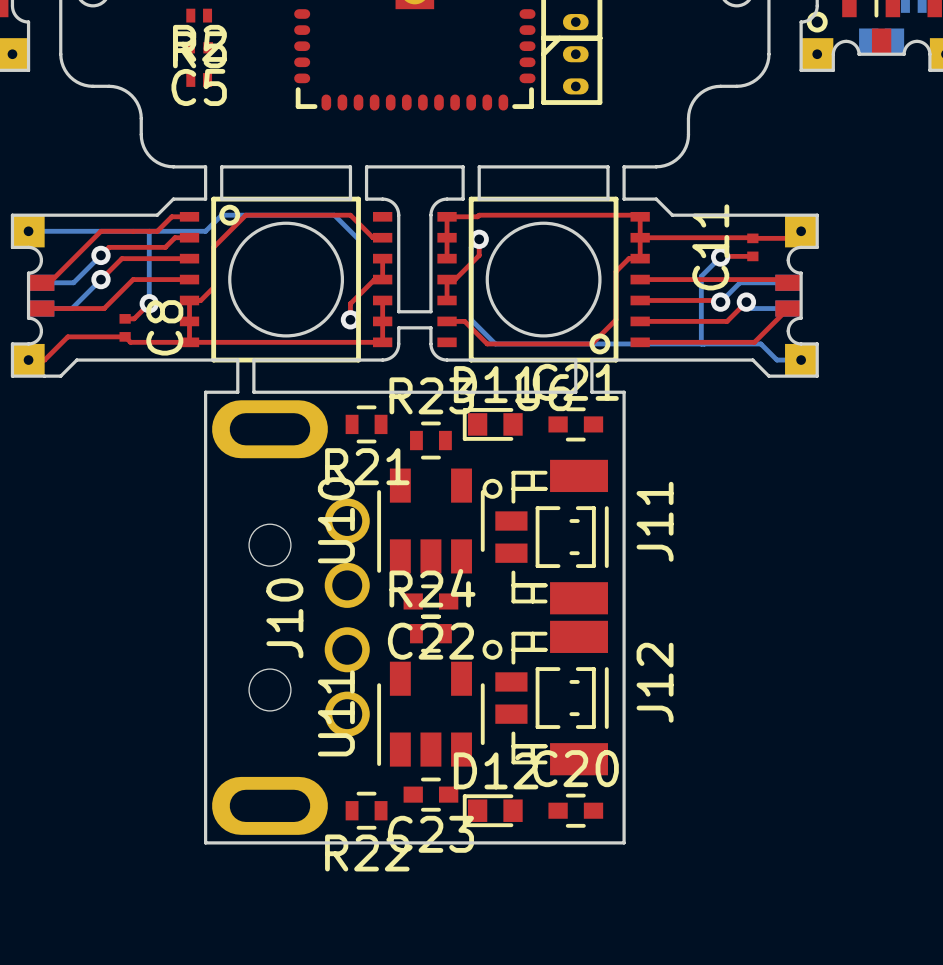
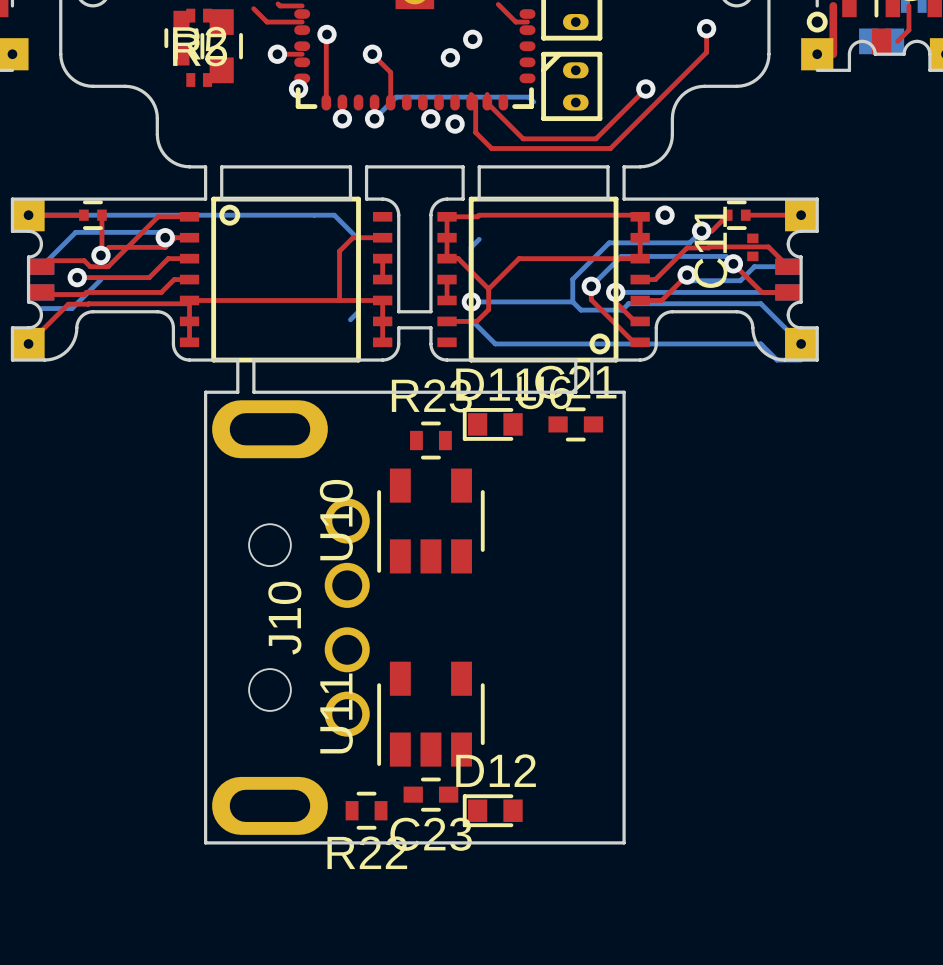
top track: none -> (278, 3) (280, 5) (302, 5)
top track: none -> (498, 4) (515, 22) (527, 22)
board edge: (12, 5) (17, 17) (28, 22) (28, 70) (12, 70) -> none
board edge: (817, 5) (812, 17) (801, 22) (801, 70) (817, 70) -> none
top track: none -> (833, 5) (833, 54)
top track: none -> (908, 5) (908, 30) (897, 41)
top track: none -> (253, 8) (267, 22) (302, 22)
top track: none -> (706, 28) (706, 52) (610, 148) (491, 148) (475, 132) (475, 98) (471, 94)
via: none -> (706, 28)
top track: none -> (326, 34) (326, 94)
via: none -> (326, 34)
part: none -> (181, 38)
via: none -> (472, 39)
part: none -> (221, 46)
C5: (199, 47) -> none
top track: none -> (277, 54) (302, 54)
via: none -> (277, 54)
top track: none -> (372, 54) (390, 72) (390, 94)
via: none -> (372, 54)
board edge: (875, 54) (859, 54) (854, 44) (847, 41) (841, 42) (833, 50) (833, 70) -> (875, 54) (870, 44) (863, 41) (857, 42) (849, 50) (849, 70) (833, 70)
via: none -> (450, 57)
part position: (571, 70) -> (571, 86)
board edge: (109, 86) (125, 90) (136, 102) (140, 114) (142, 142) (150, 157) (165, 165) (189, 166) -> (109, 86) (133, 87) (147, 95) (156, 110) (157, 138) (161, 150) (173, 162) (189, 166)
board edge: (720, 86) (704, 90) (692, 102) (688, 114) (687, 142) (679, 157) (664, 165) (640, 166) -> (720, 86) (696, 87) (681, 95) (673, 110) (672, 138) (668, 150) (656, 162) (640, 166)
via: none -> (298, 88)
top track: none -> (645, 88) (595, 138) (523, 138) (487, 102) (487, 94)
via: none -> (645, 88)
bottom track: none -> (533, 101) (528, 97) (396, 97) (374, 118)
via: none -> (342, 118)
via: none -> (374, 118)
via: none -> (430, 118)
via: none -> (455, 124)
board edge: (173, 199) (157, 215) (12, 215) -> (173, 199) (12, 199) (12, 215)
board edge: (656, 199) (672, 215) (817, 215) -> (656, 199) (817, 199) (817, 215)
top track: none -> (28, 215) (83, 215)
part: none -> (92, 215)
top track: none -> (101, 215) (101, 249)
bottom track: (221, 215) (205, 231) (28, 231) -> (221, 215) (28, 215)
via: none -> (665, 215)
top track: none -> (727, 215) (711, 231) (701, 231)
part: none -> (736, 215)
top track: none -> (745, 215) (801, 215)
top track: (171, 216) (157, 231) (100, 231) (49, 282) (41, 282) -> (171, 216) (158, 216) (108, 266) (90, 266) (84, 260) (47, 260) (41, 266)
round board edge: [228, 221, 345, 338] -> none
round board edge: [485, 221, 602, 338] -> none
board edge: (12, 231) (12, 247) (31, 247) (40, 255) (41, 261) (38, 268) (28, 273) -> (12, 231) (31, 231) (40, 239) (41, 245) (38, 252) (28, 257) (28, 273)
bottom track: (149, 231) (149, 303) -> none
bottom track: none -> (701, 231) (689, 242) (609, 242) (572, 279) (572, 301)
via: none -> (701, 231)
top track: (801, 231) (794, 238) (640, 237) -> none
board edge: (817, 231) (817, 247) (797, 247) (789, 255) (789, 266) (794, 271) (801, 273) -> (817, 231) (797, 231) (789, 239) (789, 250) (794, 255) (801, 257) (801, 273)
bottom track: none -> (165, 237) (159, 232) (75, 232) (41, 266)
via: none -> (165, 237)
top track: (372, 237) (350, 215) (245, 215) (213, 247) (213, 287) (200, 300) -> (382, 300) (200, 300)
top track: none -> (372, 237) (353, 237) (339, 251) (339, 300)
top track: (479, 239) (479, 255) (455, 279) (447, 279) -> none
via: (479, 239) -> none
bottom track: (100, 255) (73, 282) (41, 282) -> none
top track: (752, 256) (720, 257) -> none
bottom track: (720, 257) (701, 276) (701, 343) -> none
via position: (720, 257) -> (733, 263)
top track: (168, 258) (121, 258) (100, 279) -> (168, 258) (149, 277) (77, 277)
top track: none -> (447, 258) (458, 258) (488, 288)
top track: (628, 258) (616, 271) (616, 319) (591, 343) (487, 343) (464, 321) -> (628, 258) (519, 258) (488, 288)
bottom track: none -> (733, 263) (726, 256) (621, 256) (591, 286)
top track: none -> (733, 263) (762, 292) (788, 292)
bottom track: none -> (788, 266) (754, 266) (740, 280) (692, 280) (687, 275)
via: none -> (687, 275)
via position: (100, 279) -> (77, 277)
top track: (174, 279) (133, 279) (104, 308) (41, 308) -> (174, 279) (161, 292) (86, 292) (84, 294) (43, 294) (41, 292)
top track: (382, 279) (374, 279) (350, 303) (350, 319) -> none
top track: (655, 279) (785, 279) (788, 282) -> (655, 279) (686, 247) (768, 246) (788, 266)
bottom track: (788, 282) (739, 282) (720, 302) -> none
via: none -> (591, 286)
top track: none -> (488, 288) (488, 309) (476, 321) (464, 321)
bottom track: none -> (615, 292) (788, 292)
via: none -> (615, 292)
part position: (33, 295) -> (33, 279)
part position: (796, 295) -> (796, 279)
top track: none -> (189, 300) (186, 303) (88, 303)
top track: (661, 300) (719, 300) (720, 302) -> (661, 300) (687, 275)
bottom track: none -> (471, 301) (572, 301)
via: none -> (471, 301)
bottom track: none -> (572, 301) (580, 310) (622, 310) (628, 303) (760, 303) (801, 343)
board edge: (28, 302) (28, 318) (34, 319) (39, 324) (40, 336) (31, 343) (12, 343) -> (28, 302) (34, 303) (39, 308) (40, 319) (31, 327) (12, 327) (12, 343)
via: (720, 302) -> none
bottom track: (746, 302) (752, 308) (788, 308) -> none
top track: (746, 302) (727, 321) (640, 321) -> (615, 292) (615, 302) (634, 321) (640, 321)
via: (746, 302) -> none
board edge: (801, 302) (801, 318) (790, 323) (788, 329) (789, 336) (797, 343) (817, 343) -> (801, 302) (790, 307) (788, 313) (789, 319) (797, 327) (817, 327) (817, 343)
top track: (149, 303) (134, 318) (125, 318) -> none
via: (149, 303) -> none
top track: none -> (88, 304) (68, 304) (28, 343)
top track: (788, 308) (754, 342) (640, 342) -> (591, 286) (591, 299) (633, 342) (640, 342)
via: (350, 319) -> none
C8: (125, 327) -> none
top track: (382, 342) (130, 342) (125, 336) (67, 336) (44, 360) (28, 360) -> none
board edge: (12, 360) (12, 376) (60, 376) (76, 360) (189, 360) -> (12, 360) (48, 359) (60, 355) (72, 343) (80, 318) (86, 312) (92, 311) (157, 311) (165, 313) (172, 323) (175, 352) (181, 357) (189, 360)
board edge: (640, 360) (752, 360) (768, 376) (817, 376) (817, 360) -> (640, 360) (648, 357) (654, 352) (657, 321) (662, 315) (672, 311) (740, 312) (750, 319) (757, 343) (768, 355) (780, 359) (817, 360)
R21: (366, 424) -> none
J11: (545, 537) -> none
C22: (430, 601) -> none
R24: (430, 633) -> none
J12: (545, 698) -> none
C20: (575, 810) -> none

